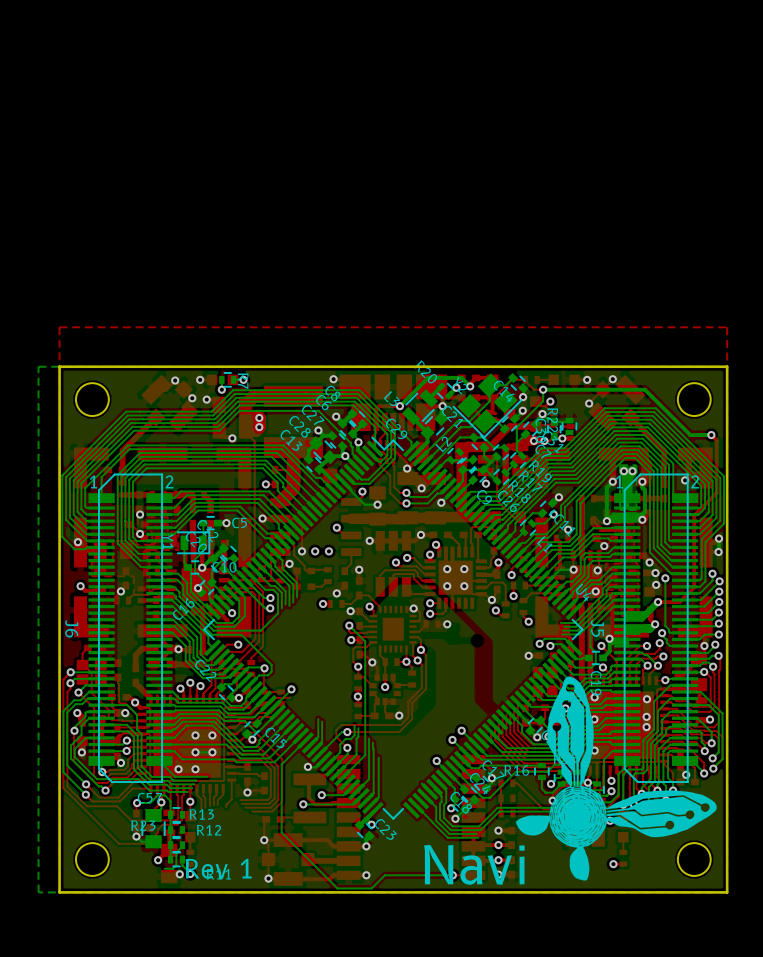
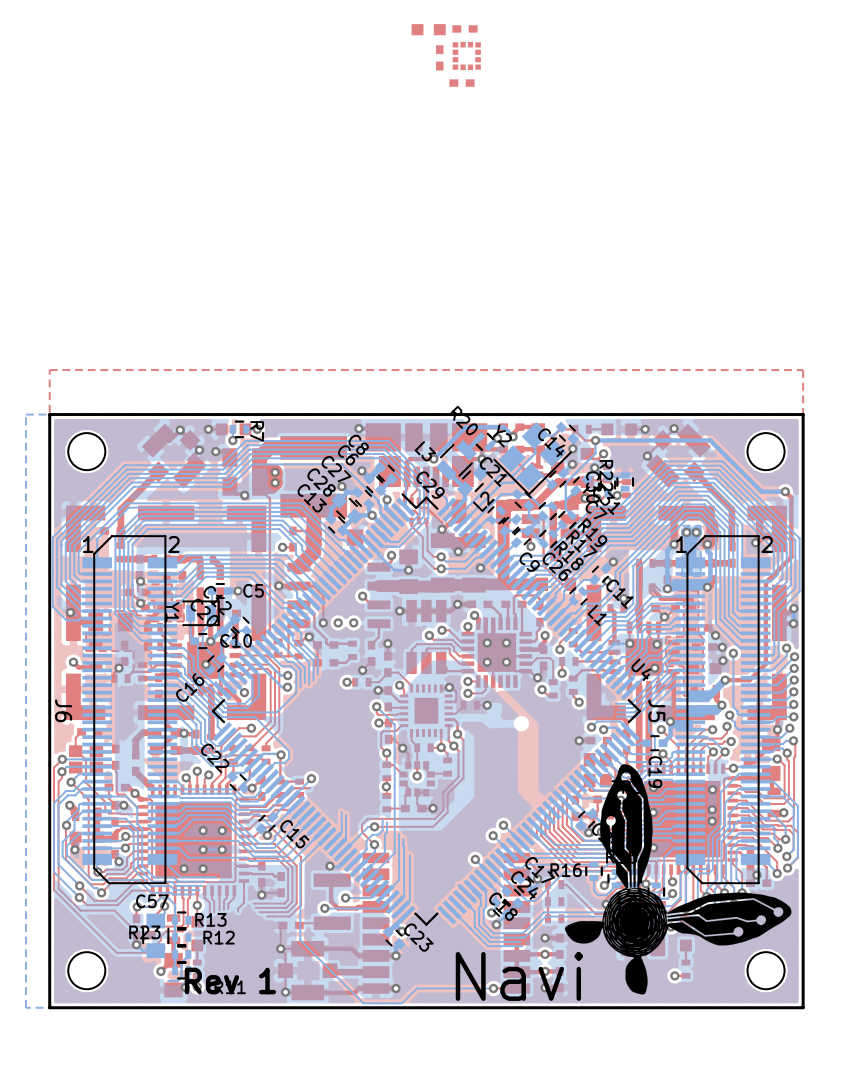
part: none -> (428, 29)
part: none -> (464, 28)
part: none -> (466, 56)
part: none -> (439, 57)
part: none -> (462, 83)

